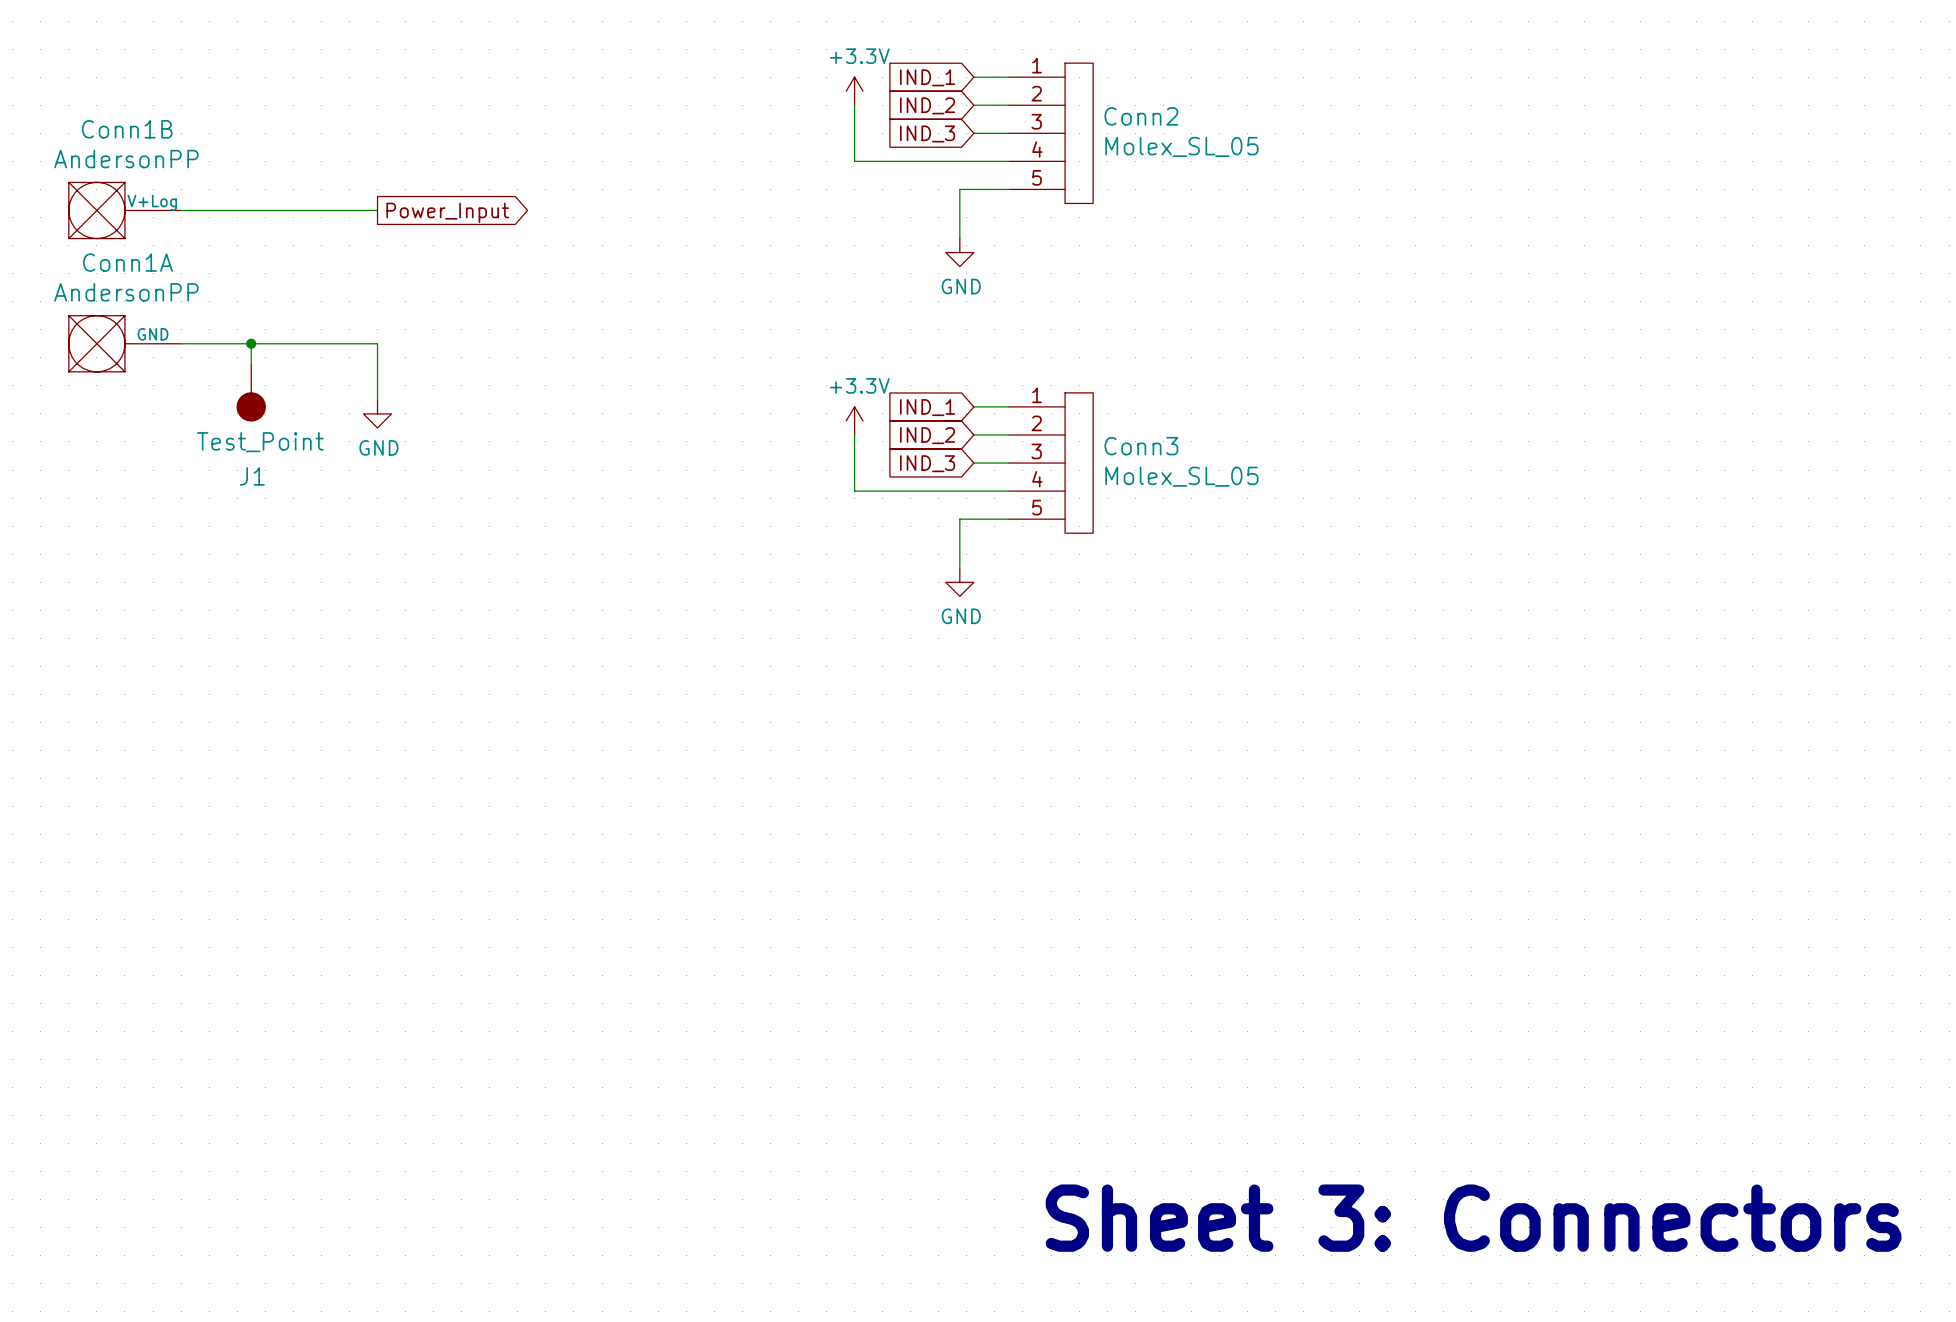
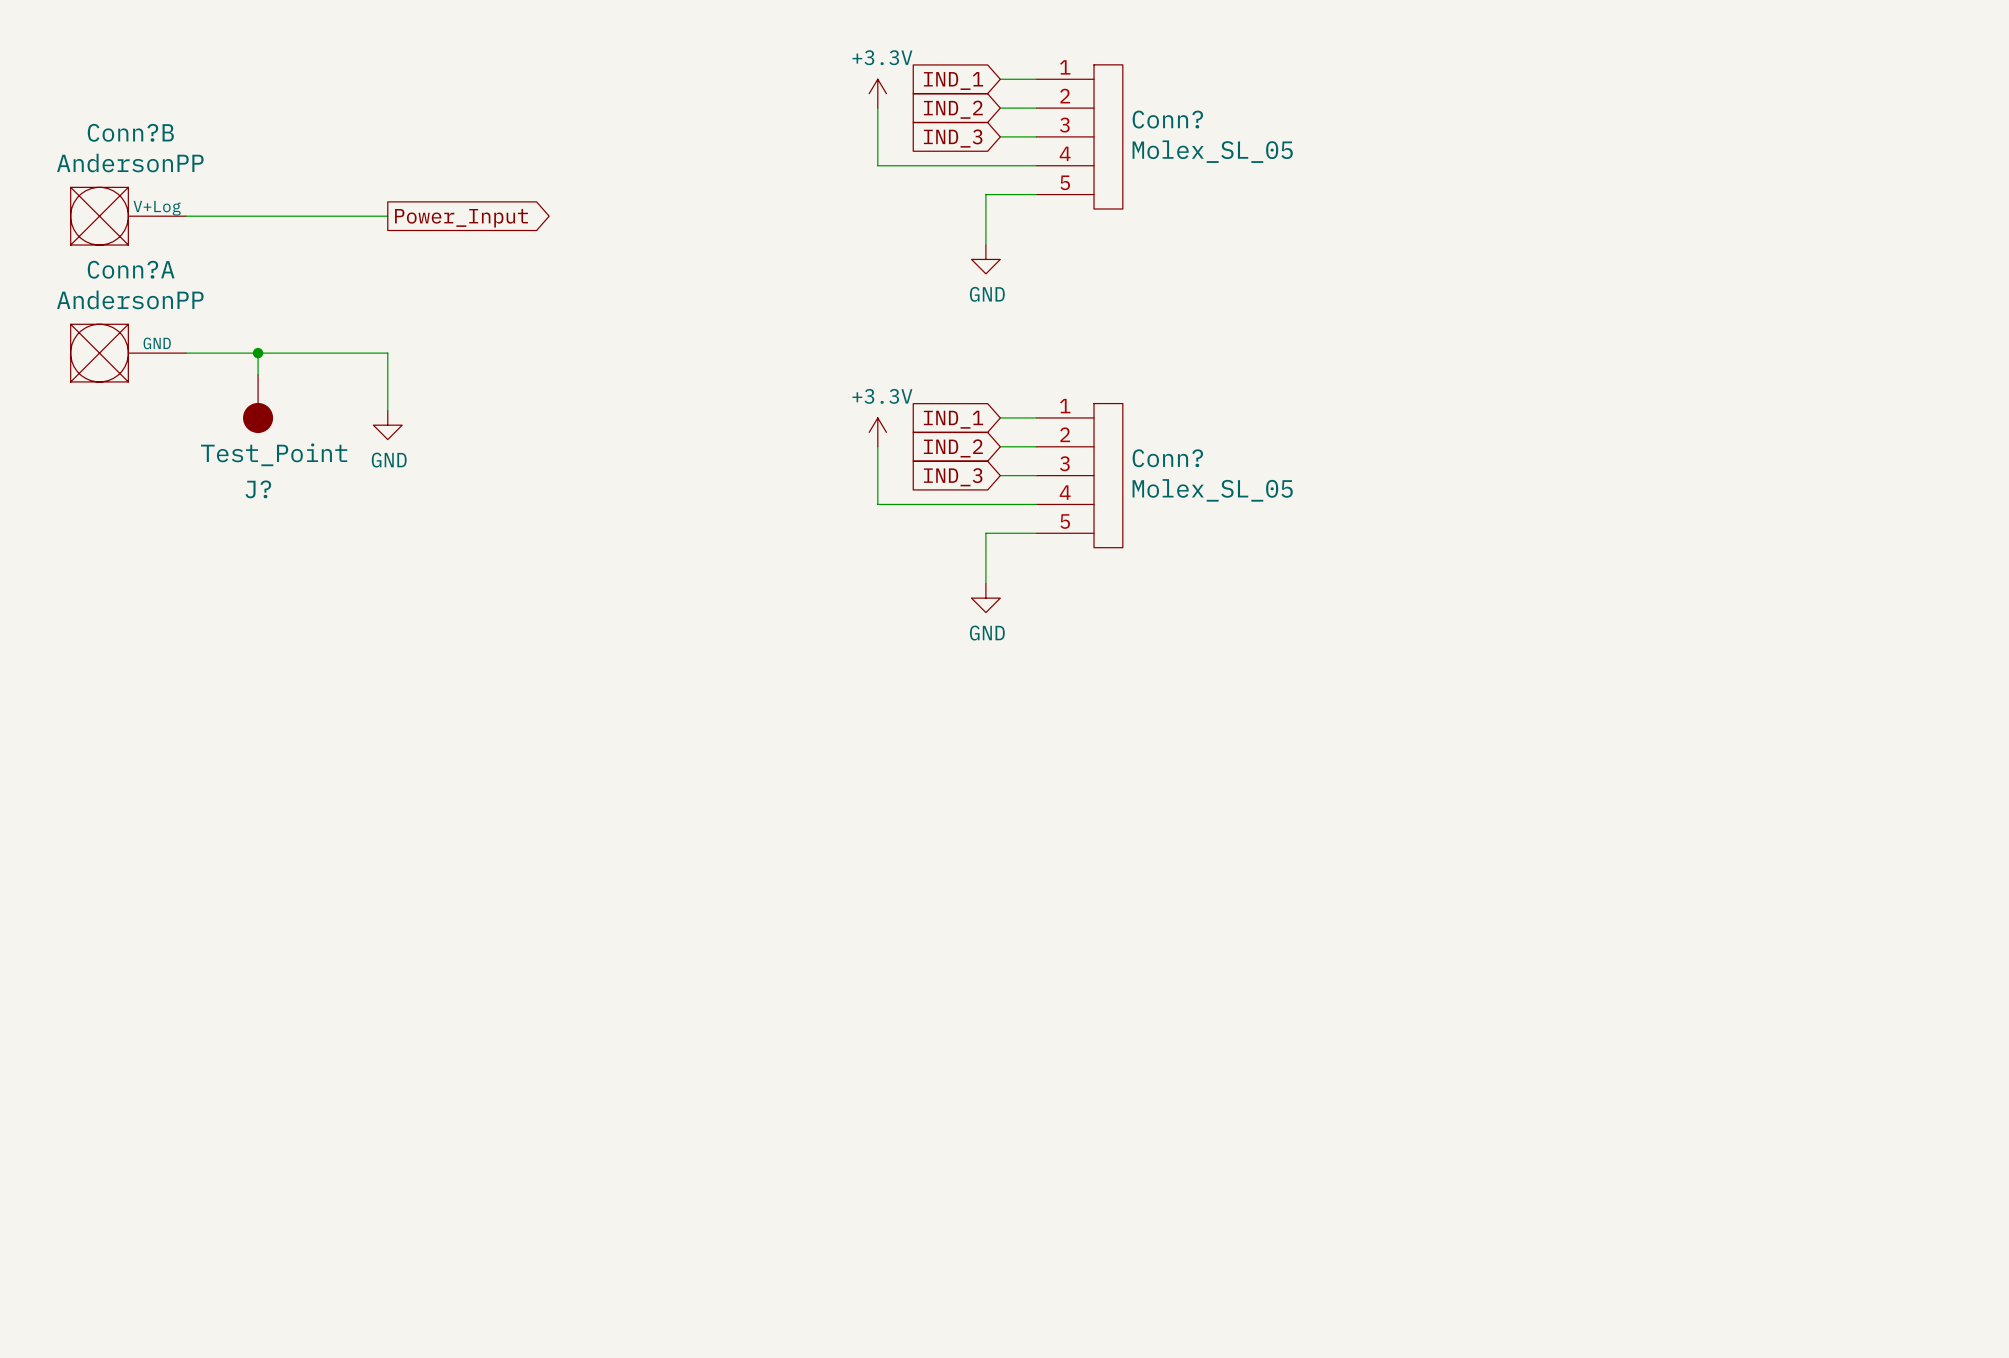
Conn2 name: Conn2 (1141, 116) -> Conn? (1167, 119)
Conn1B name: Conn1B (127, 129) -> Conn?B (130, 132)
Conn1A name: Conn1A (128, 262) -> Conn?A (131, 269)
Conn3 name: Conn3 (1141, 446) -> Conn? (1167, 458)
J1 name: J1 (252, 476) -> J? (258, 489)
text: Sheet 3: Connectors (1473, 1218) -> none

